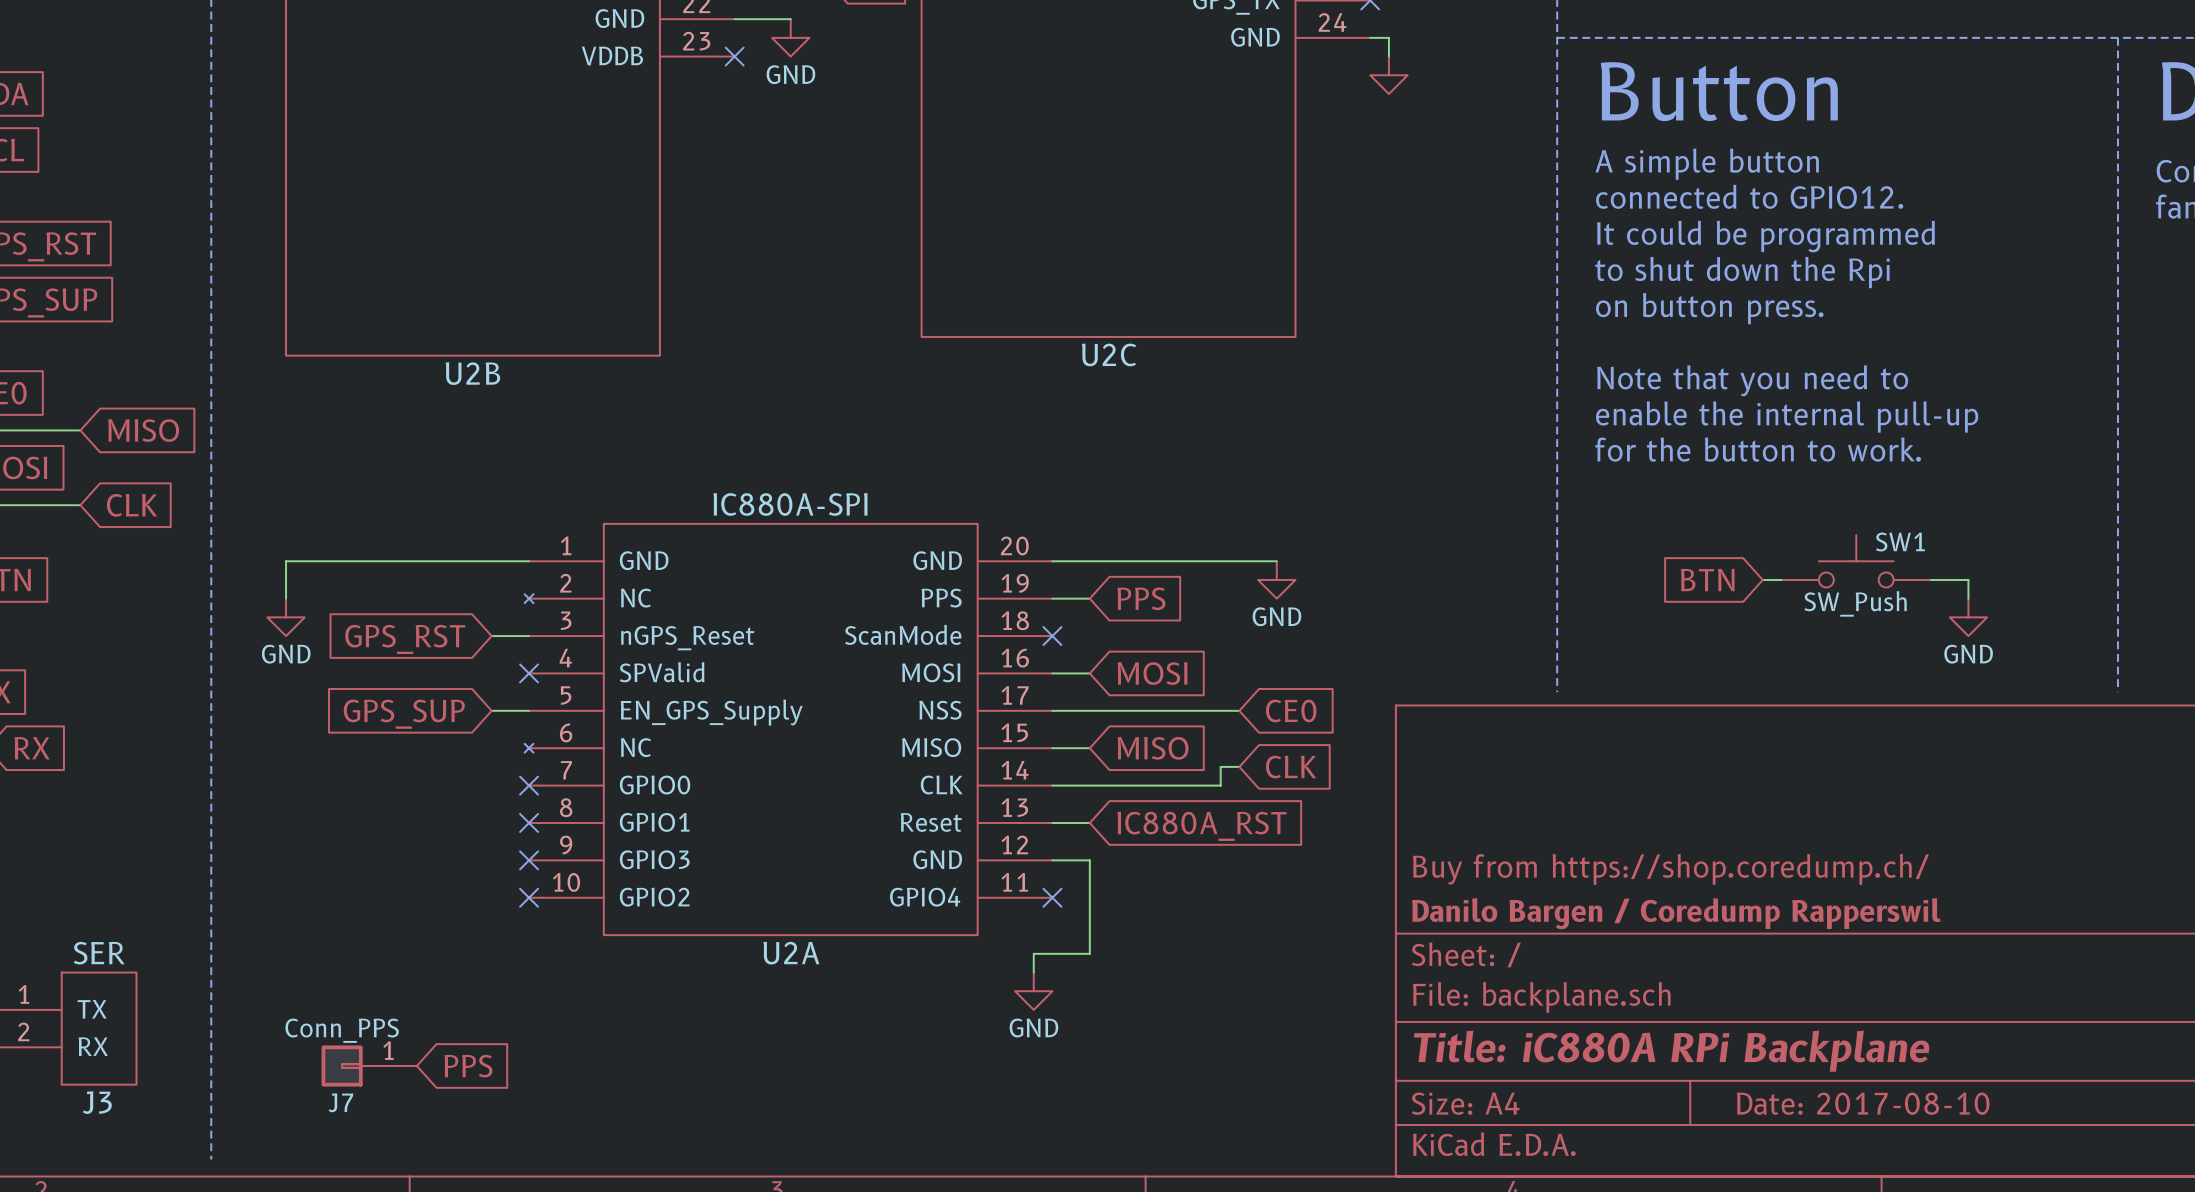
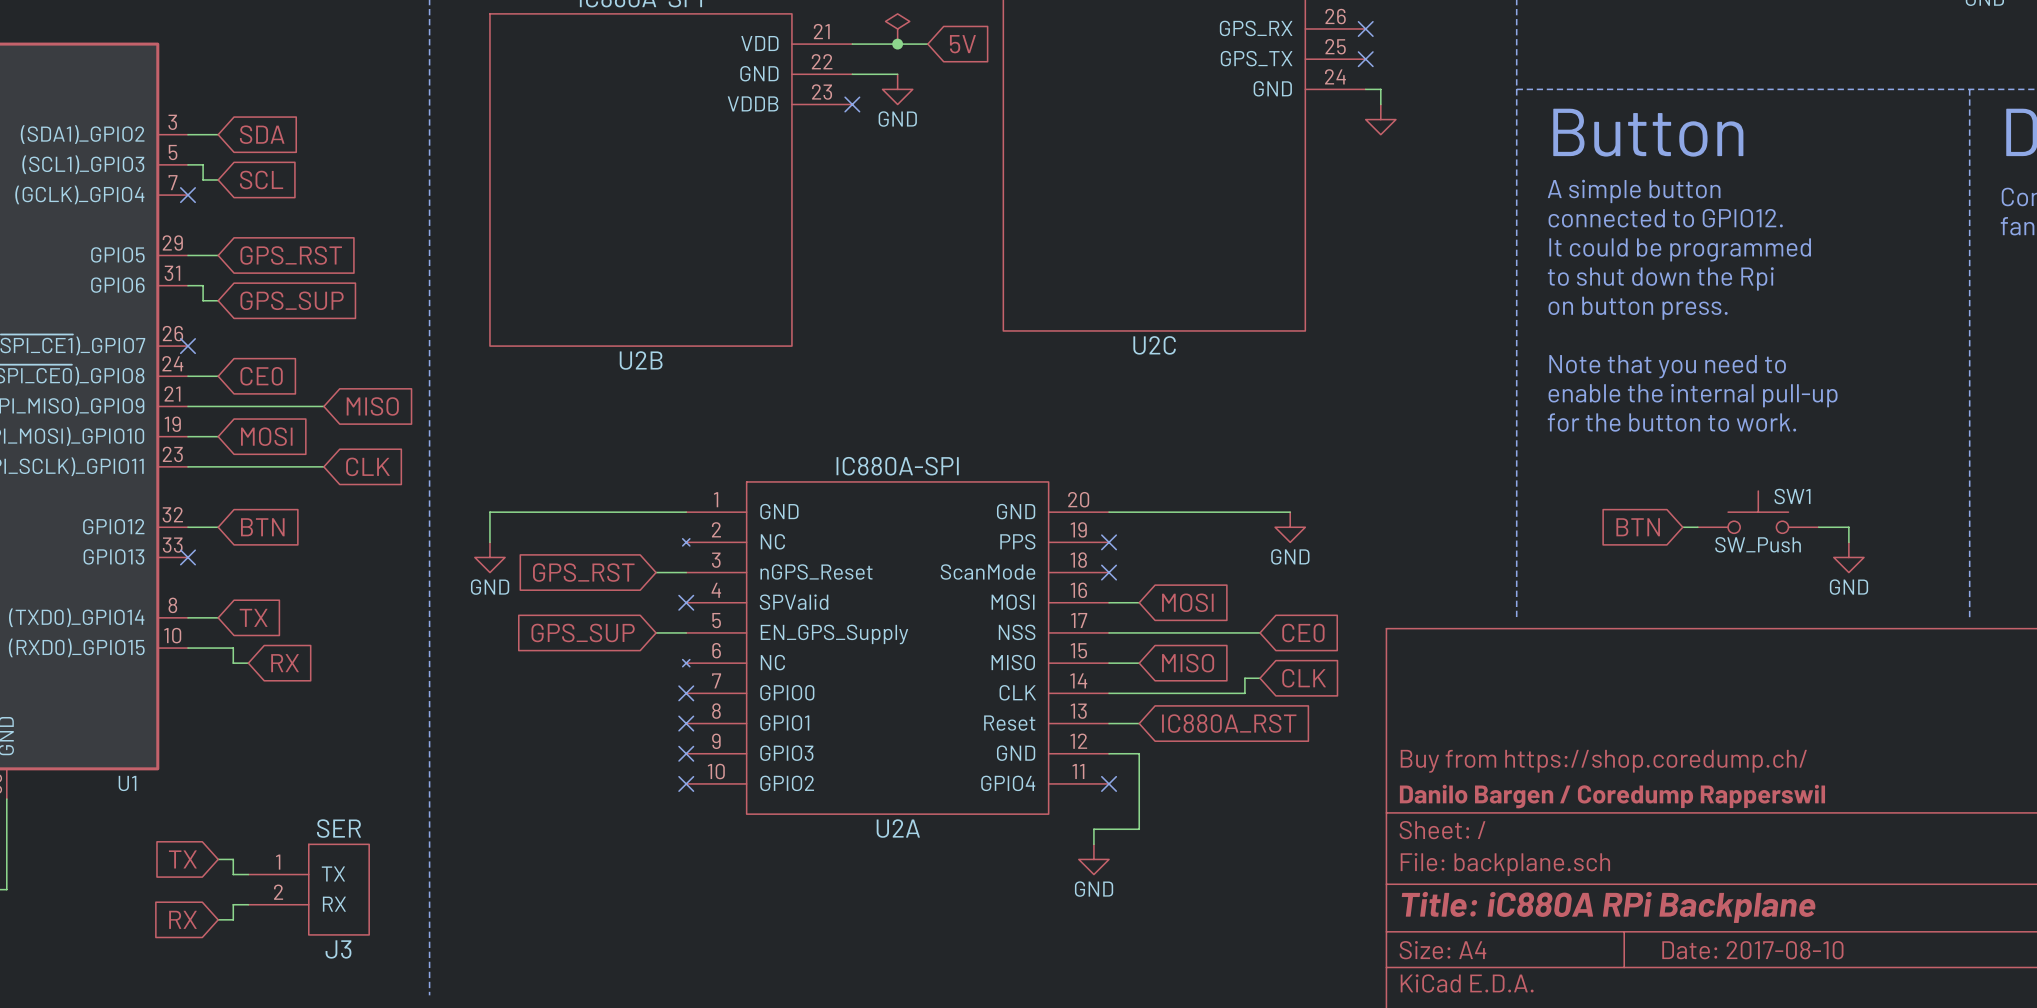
wire: (1052, 598) (1089, 598) -> none
no-connect mark: none -> (1109, 542)
global label: PPS (1141, 598) -> none
J7: Conn_PPS (369, 1065) -> none
global label: PPS (468, 1066) -> none

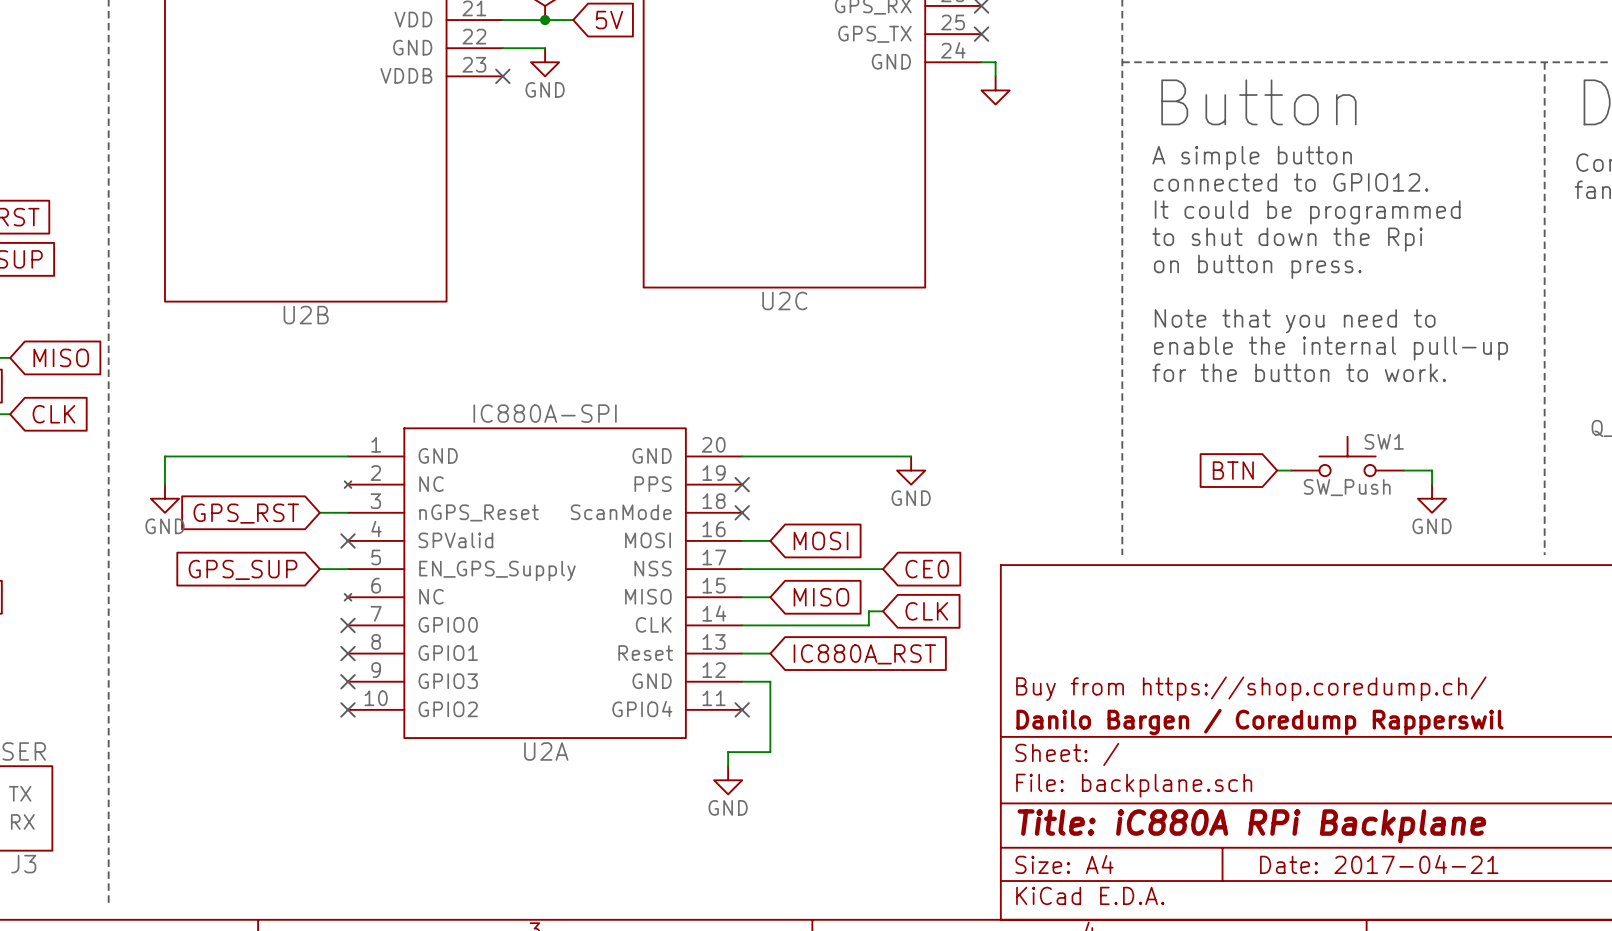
title block: Date: 2017-08-10 (1752, 950) -> Date: 2017-04-21 (1379, 864)

